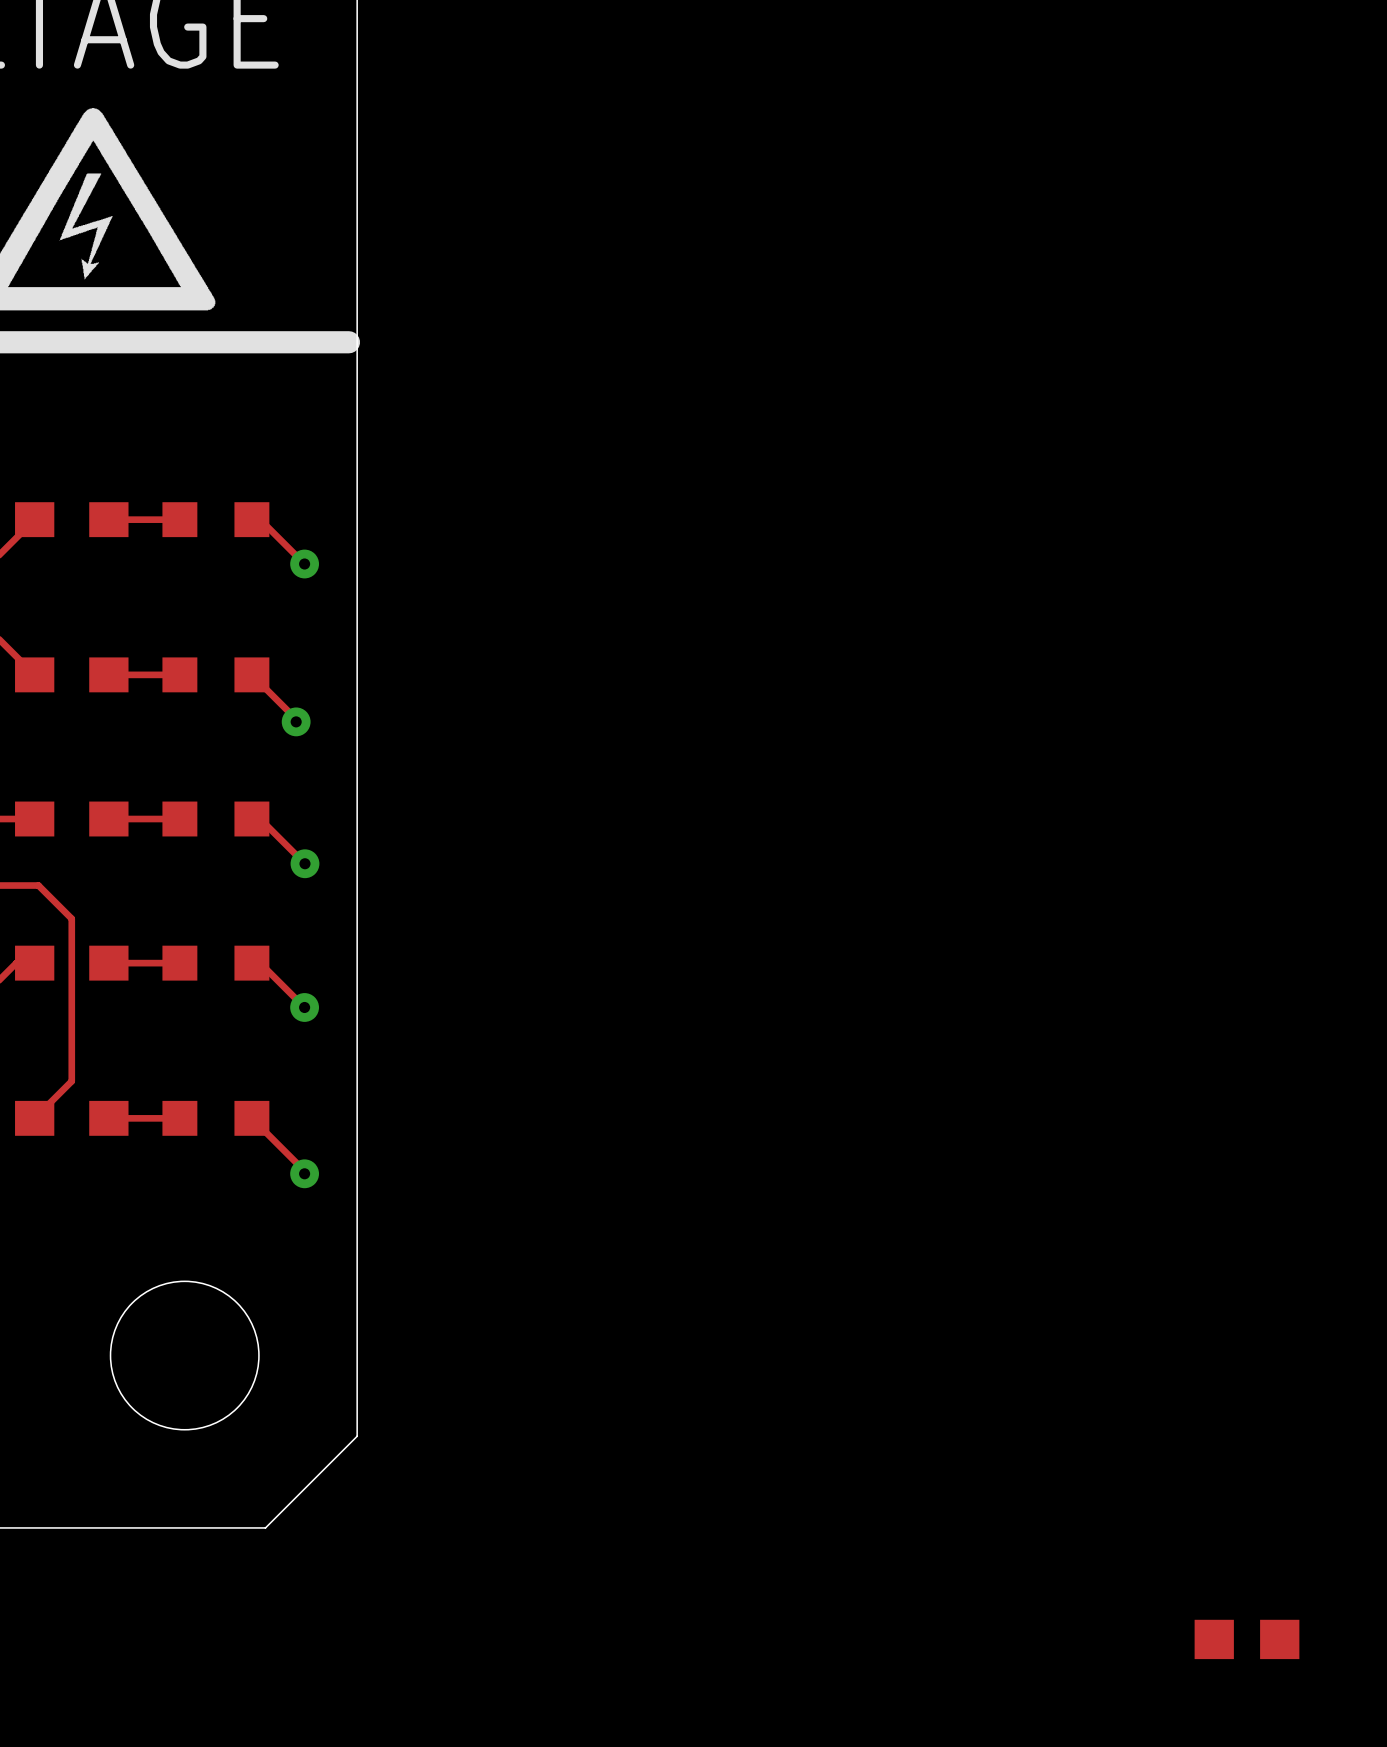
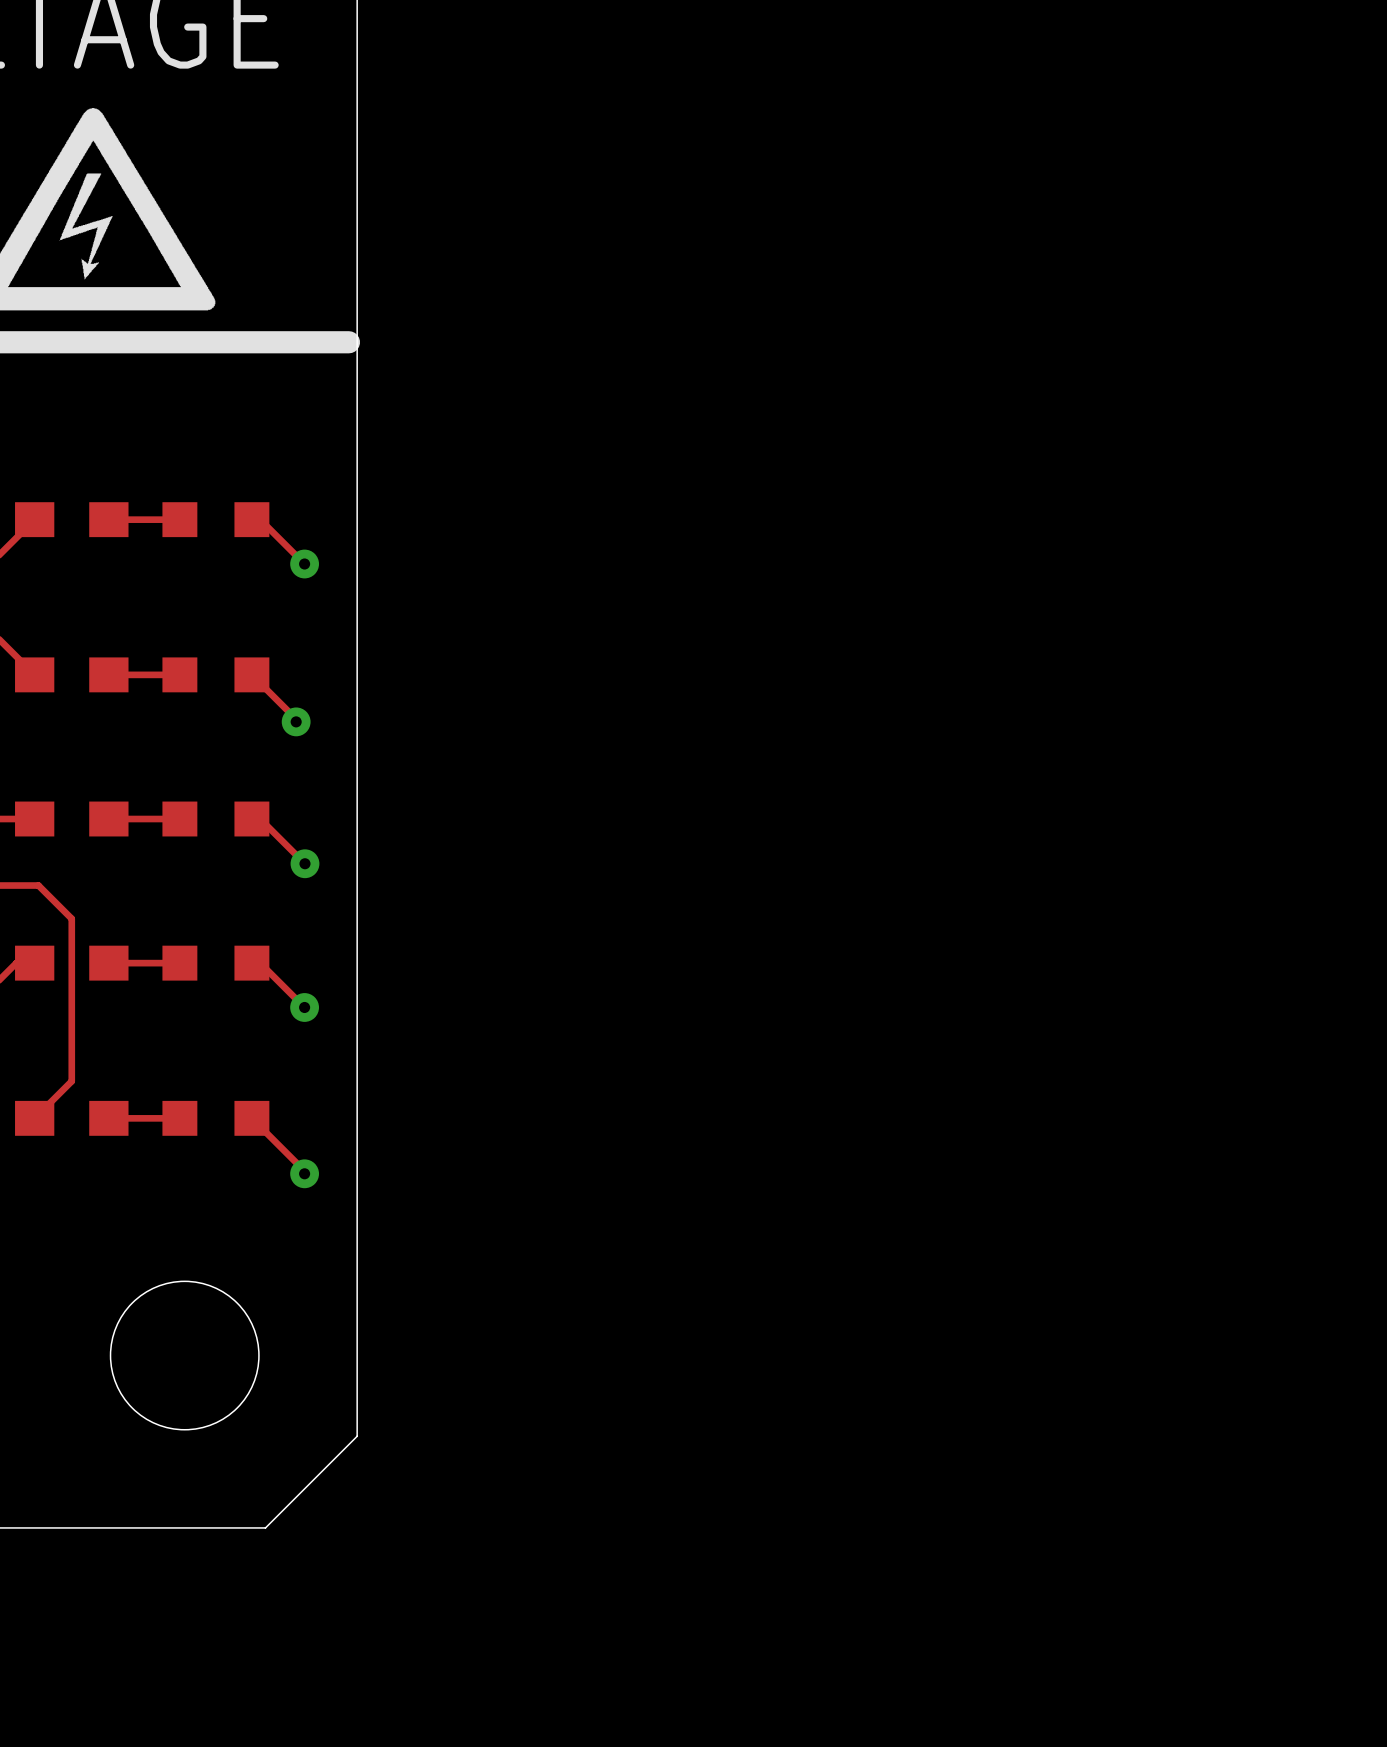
part: (1246, 1639) -> none

